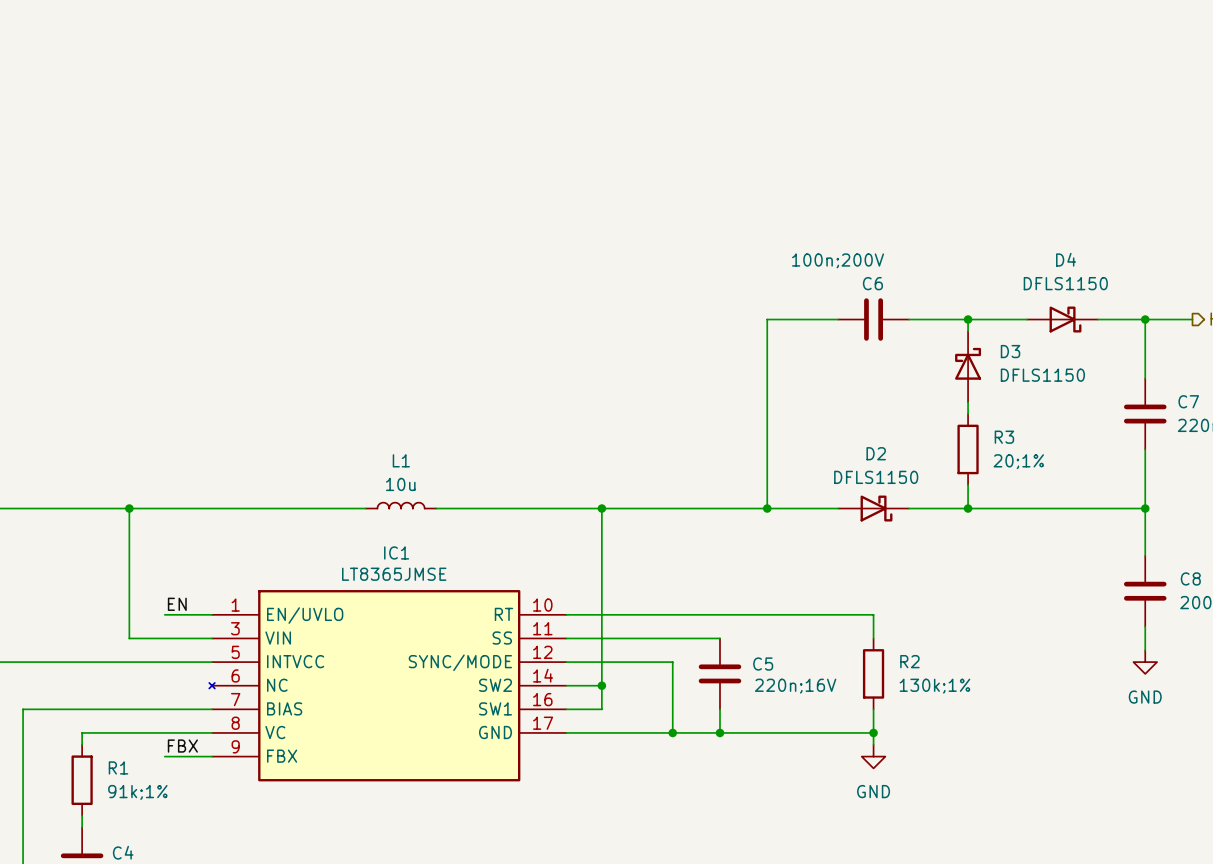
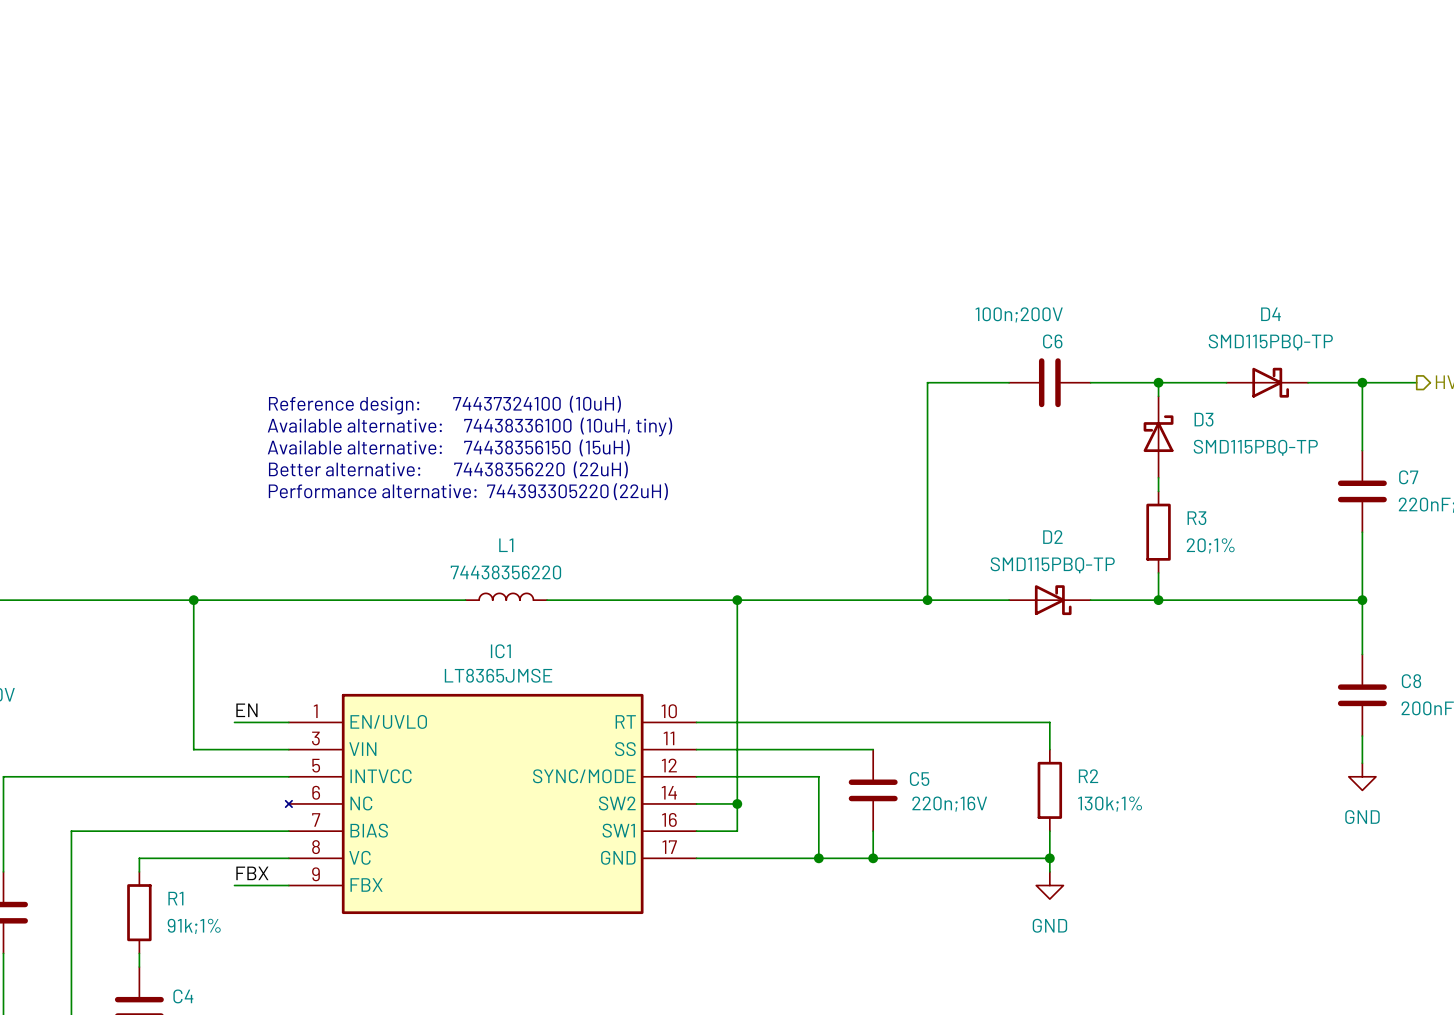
D4 value: DFLS1150 (1065, 283) -> SMD115PBQ-TP (1270, 342)
text: none -> Reference design: 74437324100 (10uH) (444, 405)
text: none -> Available alternative: 74438336100 (10uH, tiny) (469, 427)
D3 value: DFLS1150 (1042, 375) -> SMD115PBQ-TP (1255, 447)
text: none -> Available alternative: 74438356150 (15uH) (448, 447)
text: none -> Better alternative: 74438356220 (22uH) (448, 469)
text: none -> Performance alternative: 744393305220 (22uH) (468, 491)
D2 value: DFLS1150 (876, 477) -> SMD115PBQ-TP (1052, 565)
L1 value: 10u (400, 484) -> 74438356220 (505, 572)

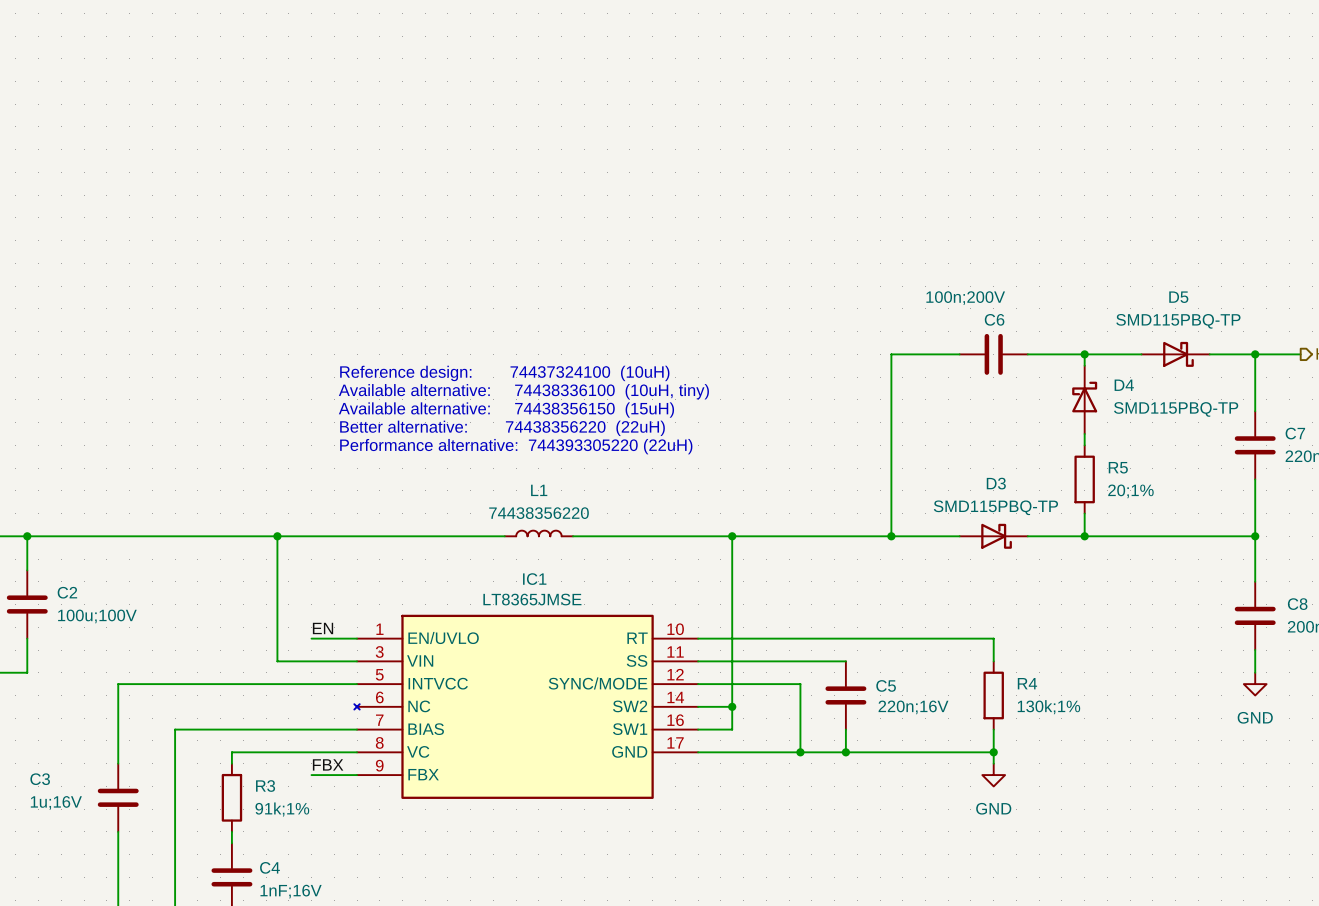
D4 name: D4 (1270, 314) -> D5 (1178, 297)
D3 name: D3 (1204, 419) -> D4 (1124, 385)
R3 name: R3 (1196, 518) -> R5 (1118, 467)
D2 name: D2 (1052, 537) -> D3 (996, 483)
R2 name: R2 (1088, 776) -> R4 (1027, 683)
R1 name: R1 (175, 898) -> R3 (265, 786)

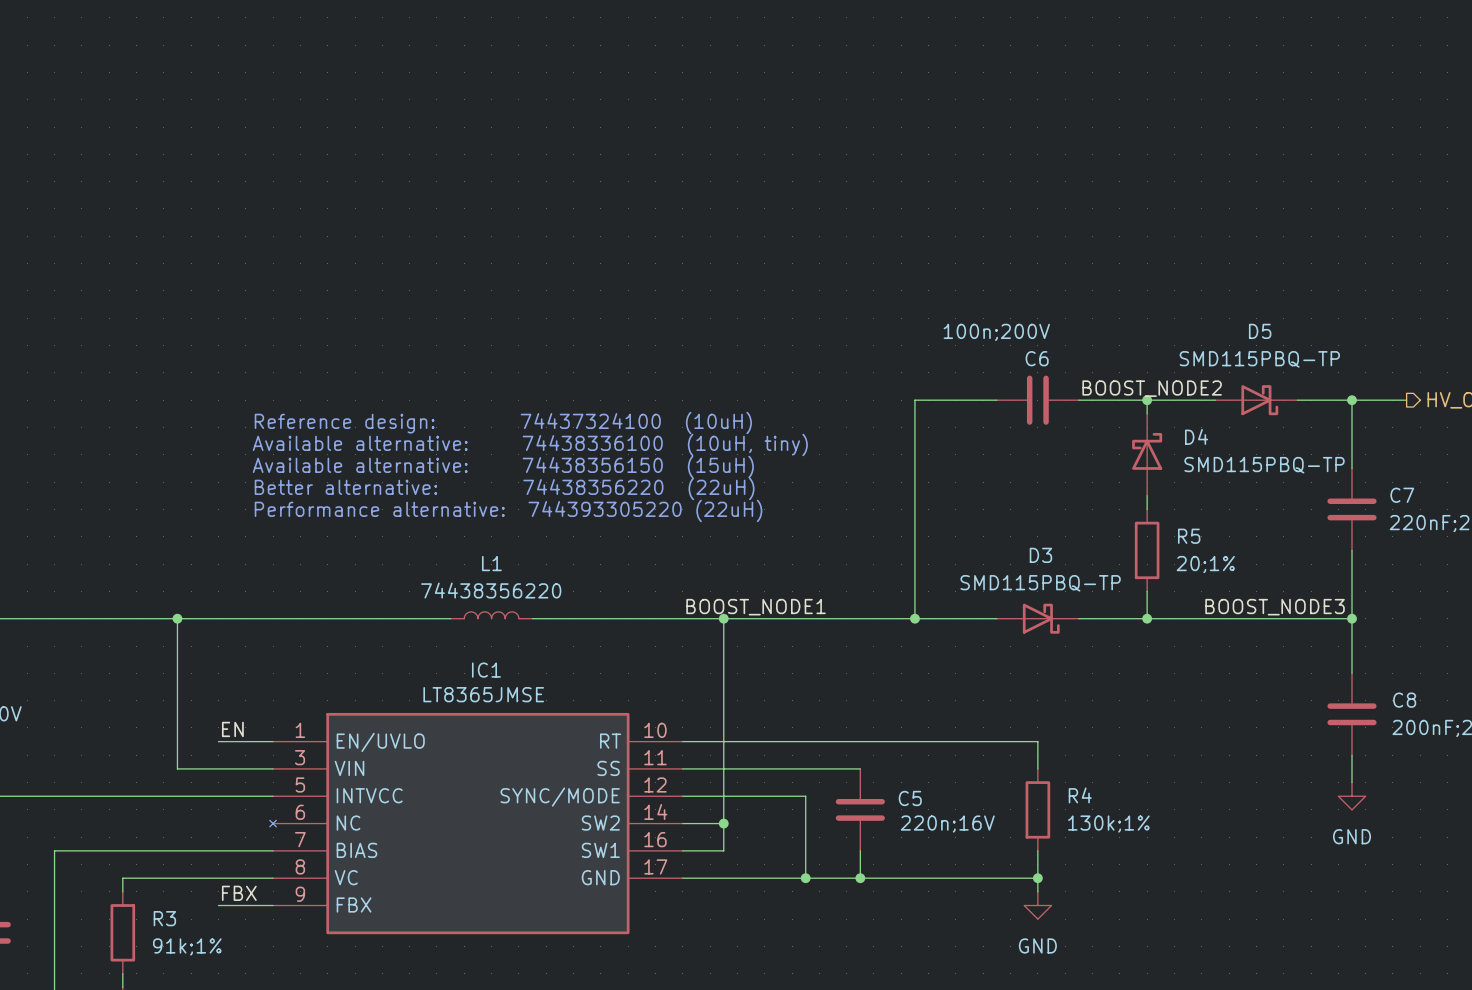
label: none -> BOOST_NODE2 (1152, 388)
label: none -> BOOST_NODE1 (756, 607)
label: none -> BOOST_NODE3 (1275, 607)

